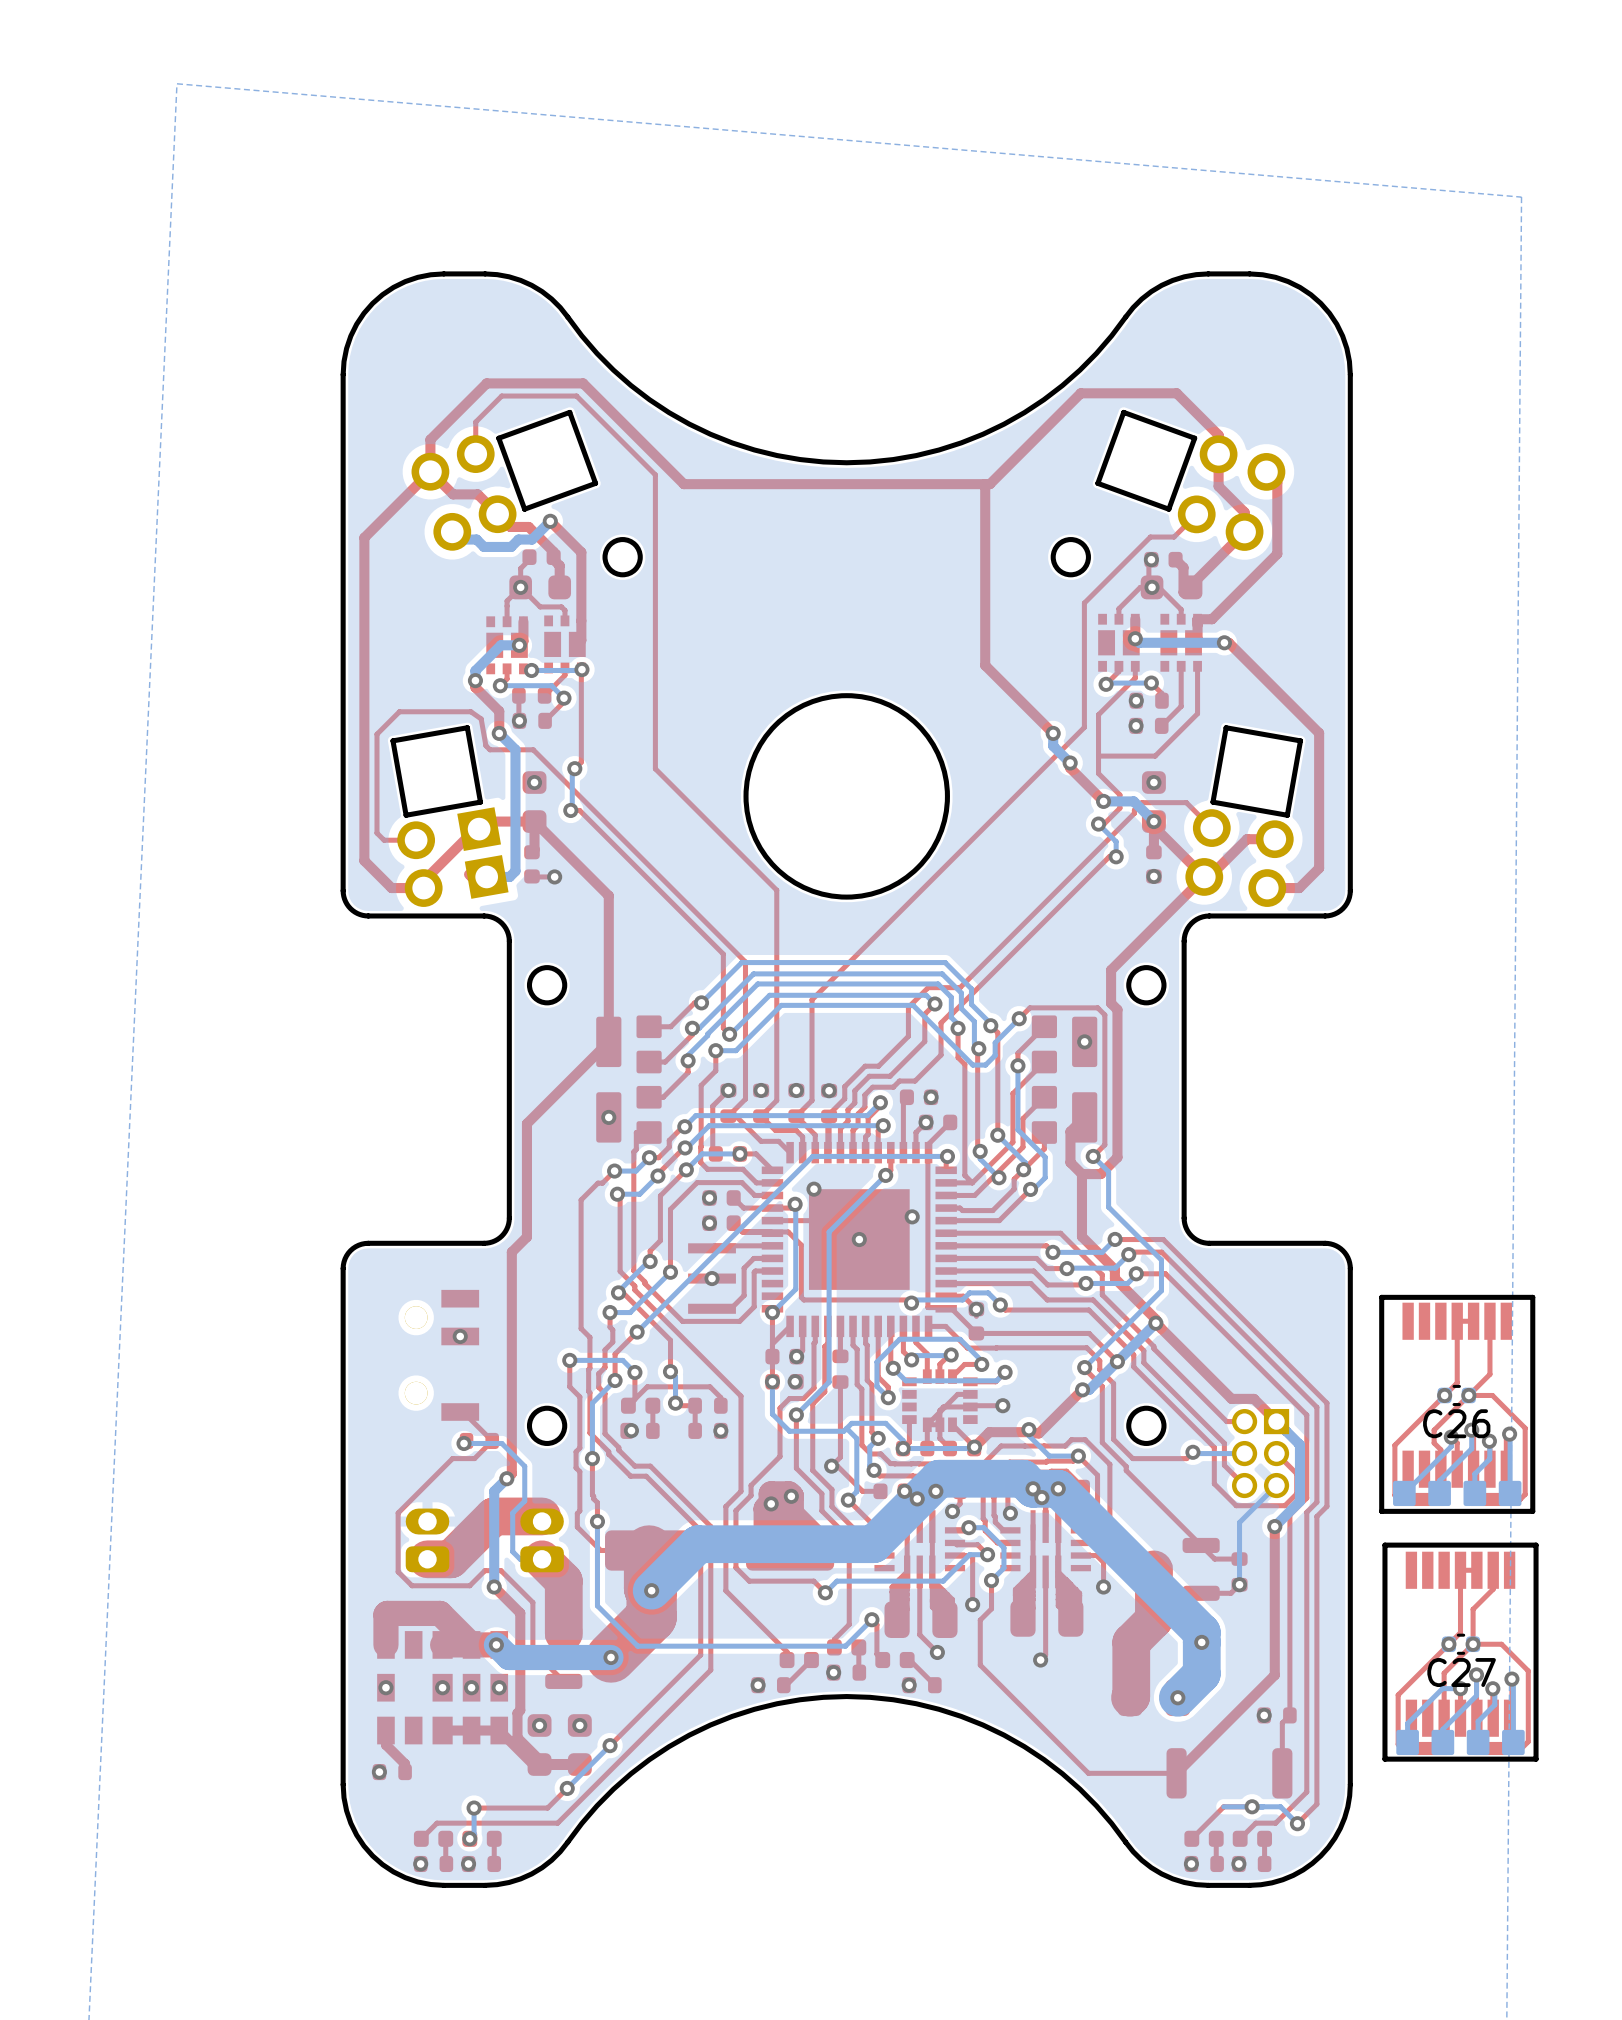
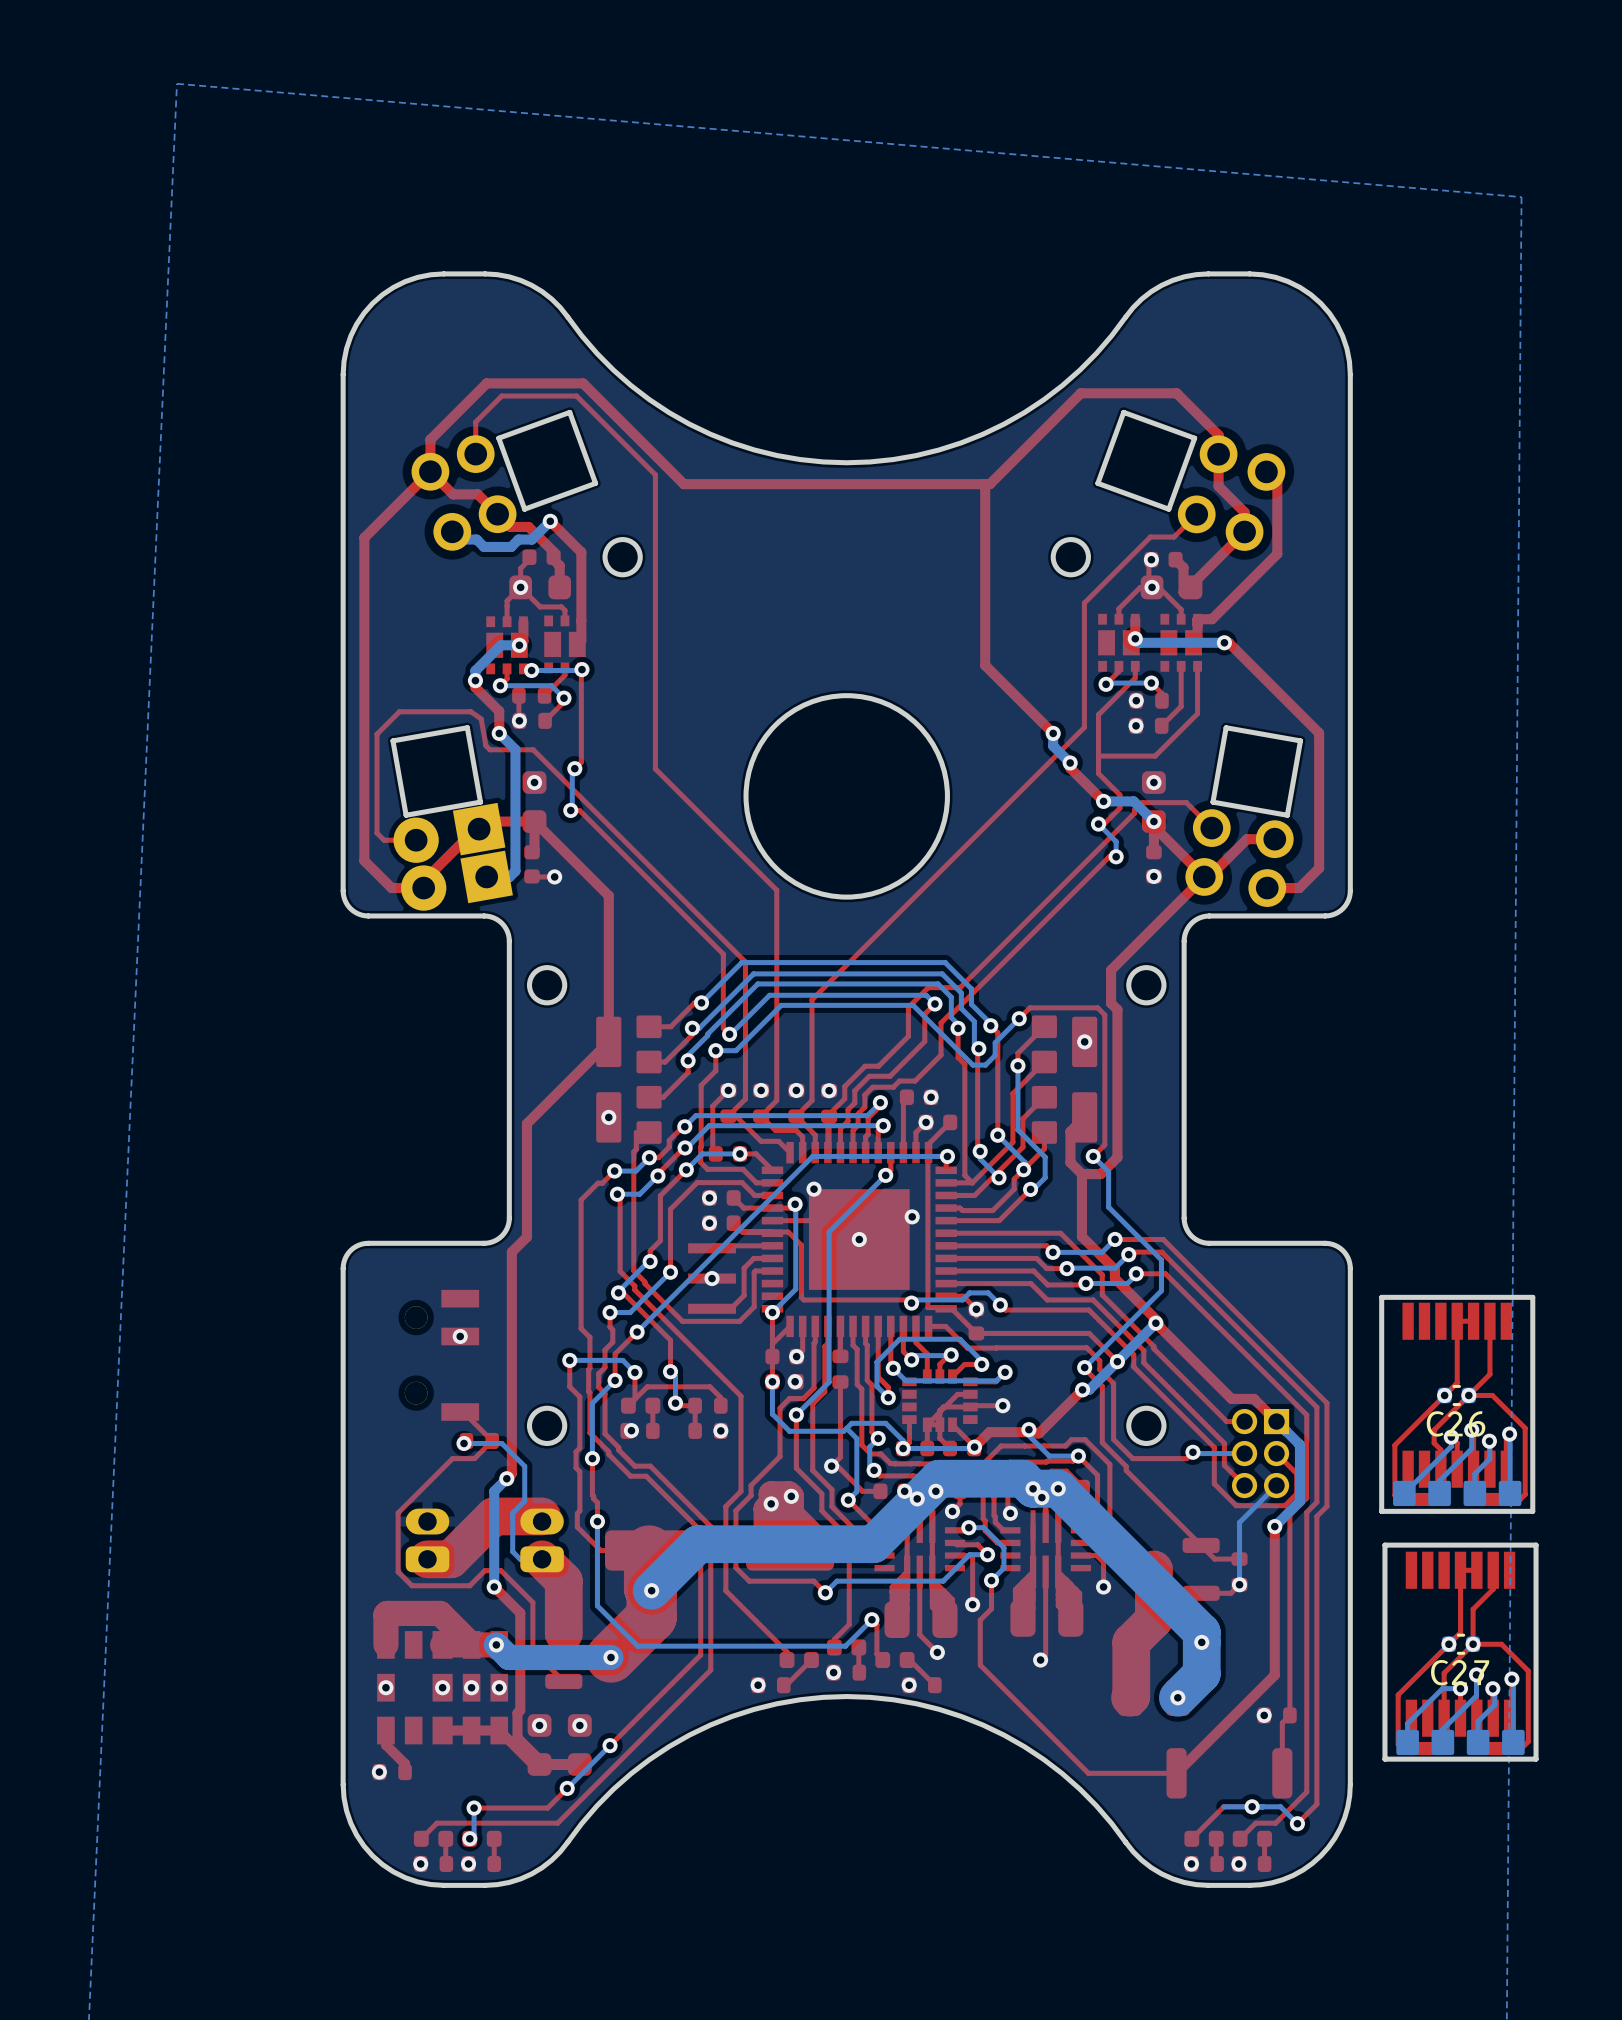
part footprint: [397, 807, 501, 860] -> [393, 802, 506, 863]
part footprint: [404, 855, 509, 907] -> [401, 850, 513, 911]

